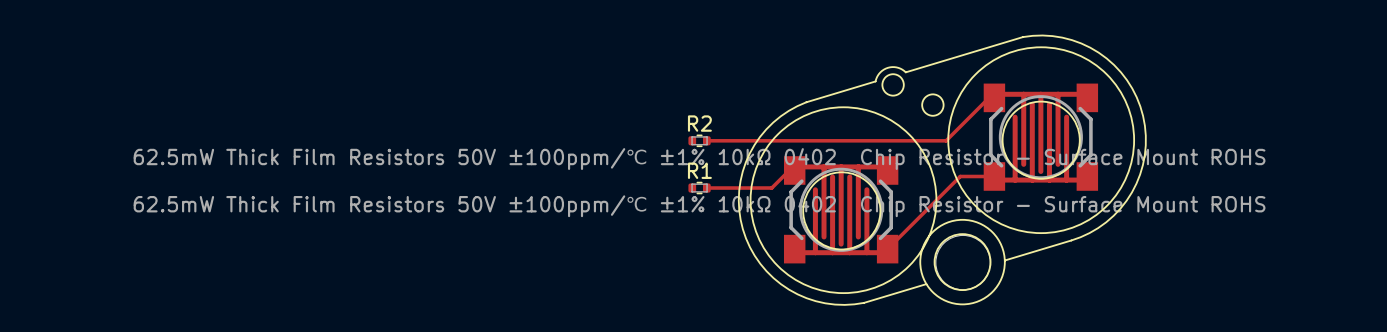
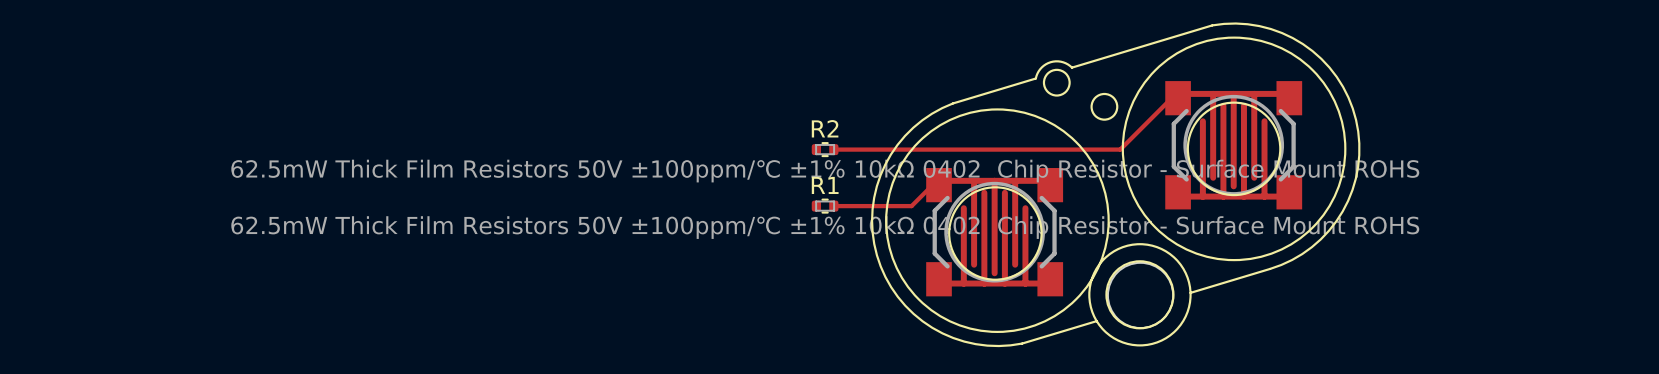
part footprint: [983, 83, 1099, 191] -> [1165, 81, 1303, 210]
part footprint: [783, 156, 899, 264] -> [926, 168, 1064, 297]
top track: (994, 176) (960, 176) (887, 249) -> none

